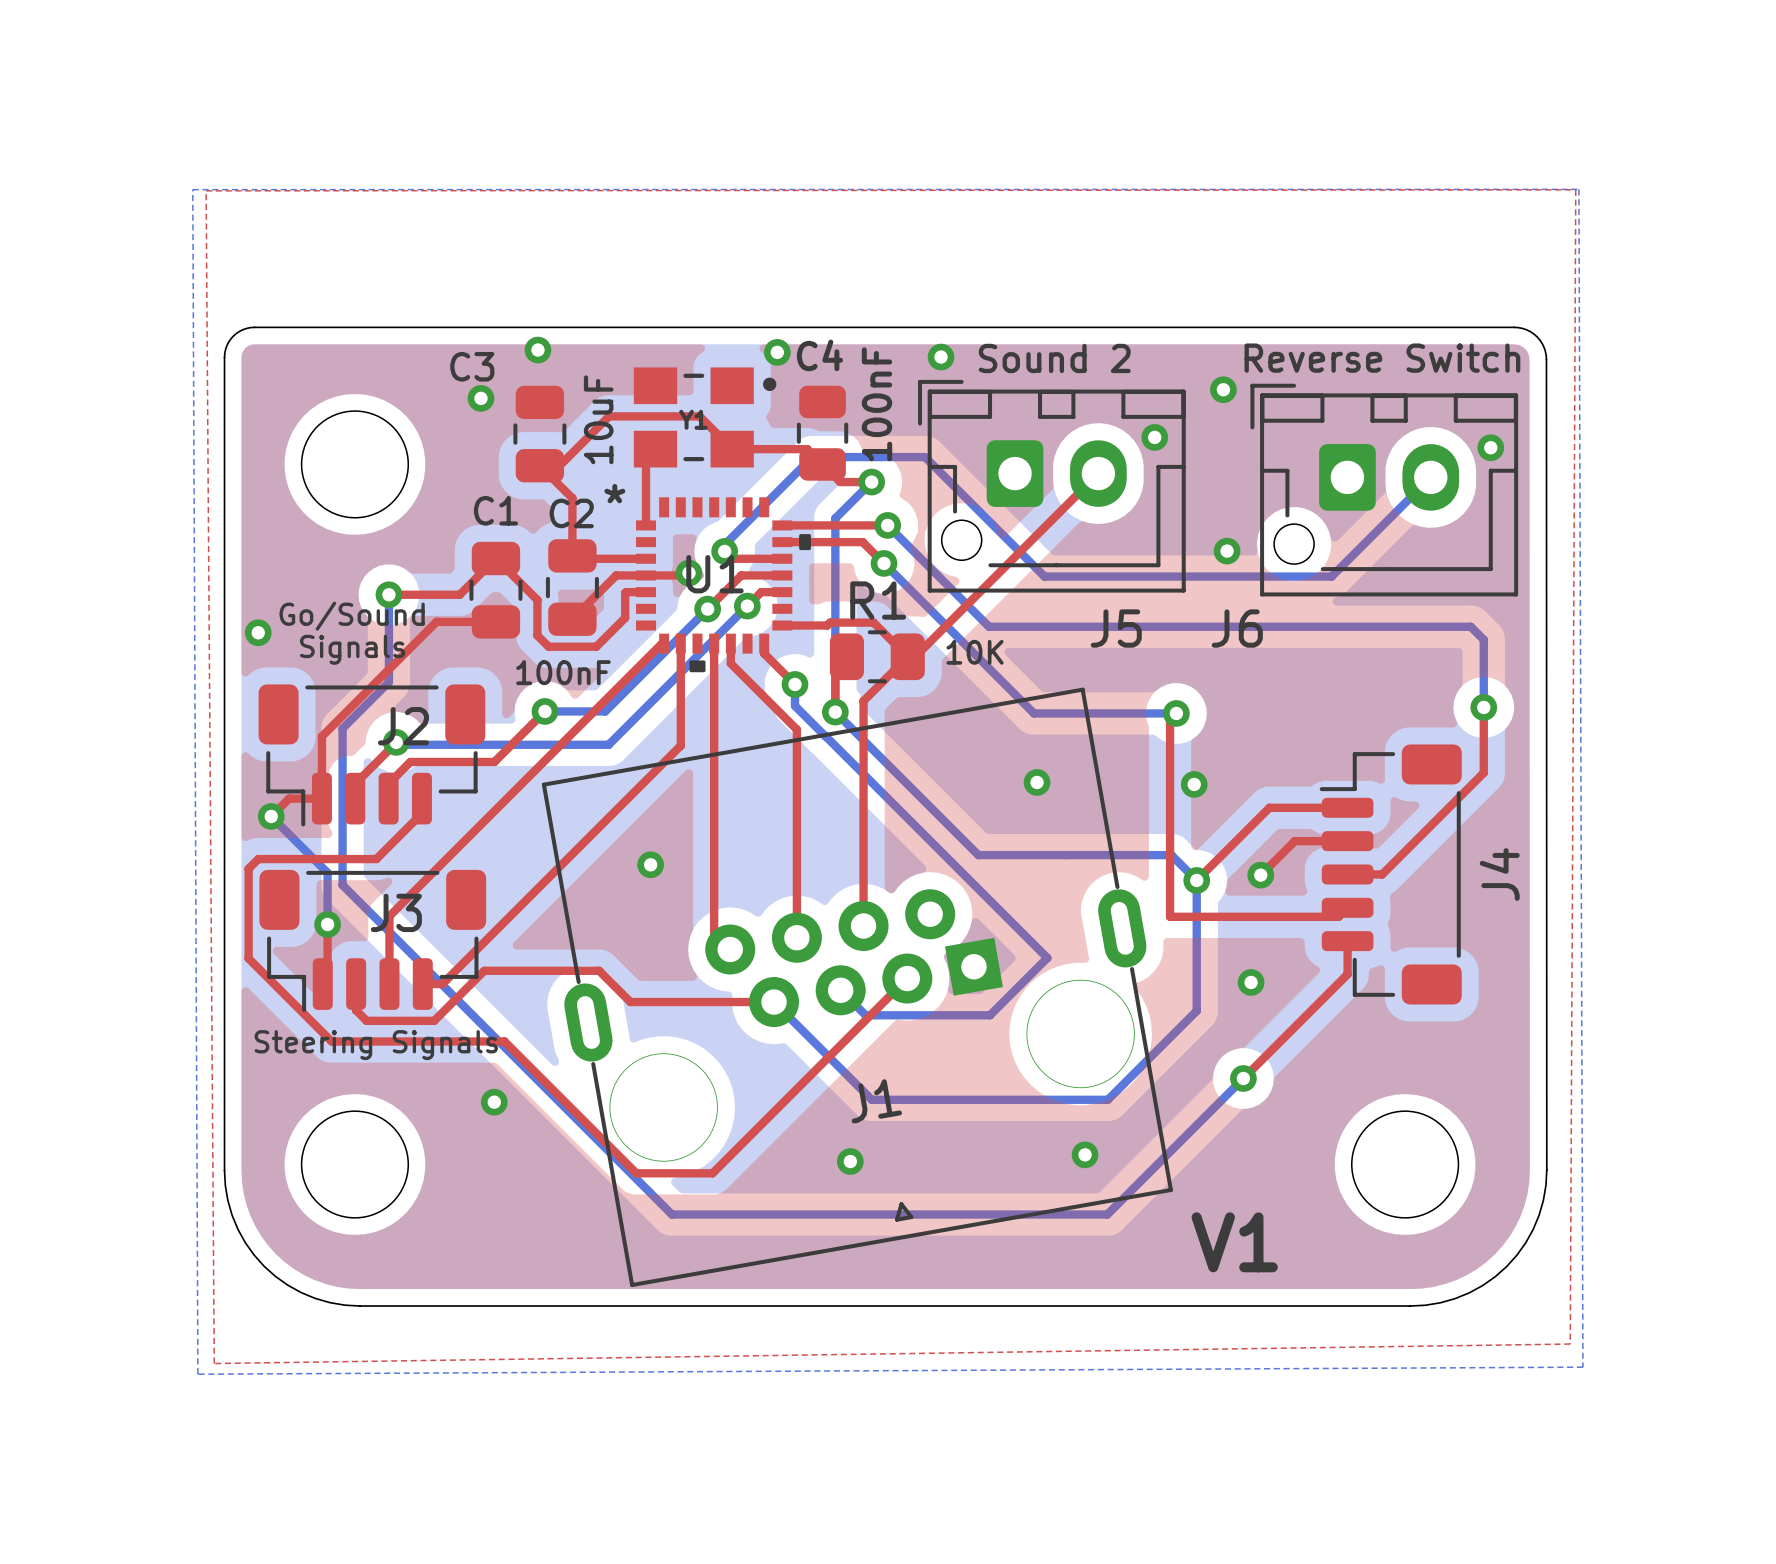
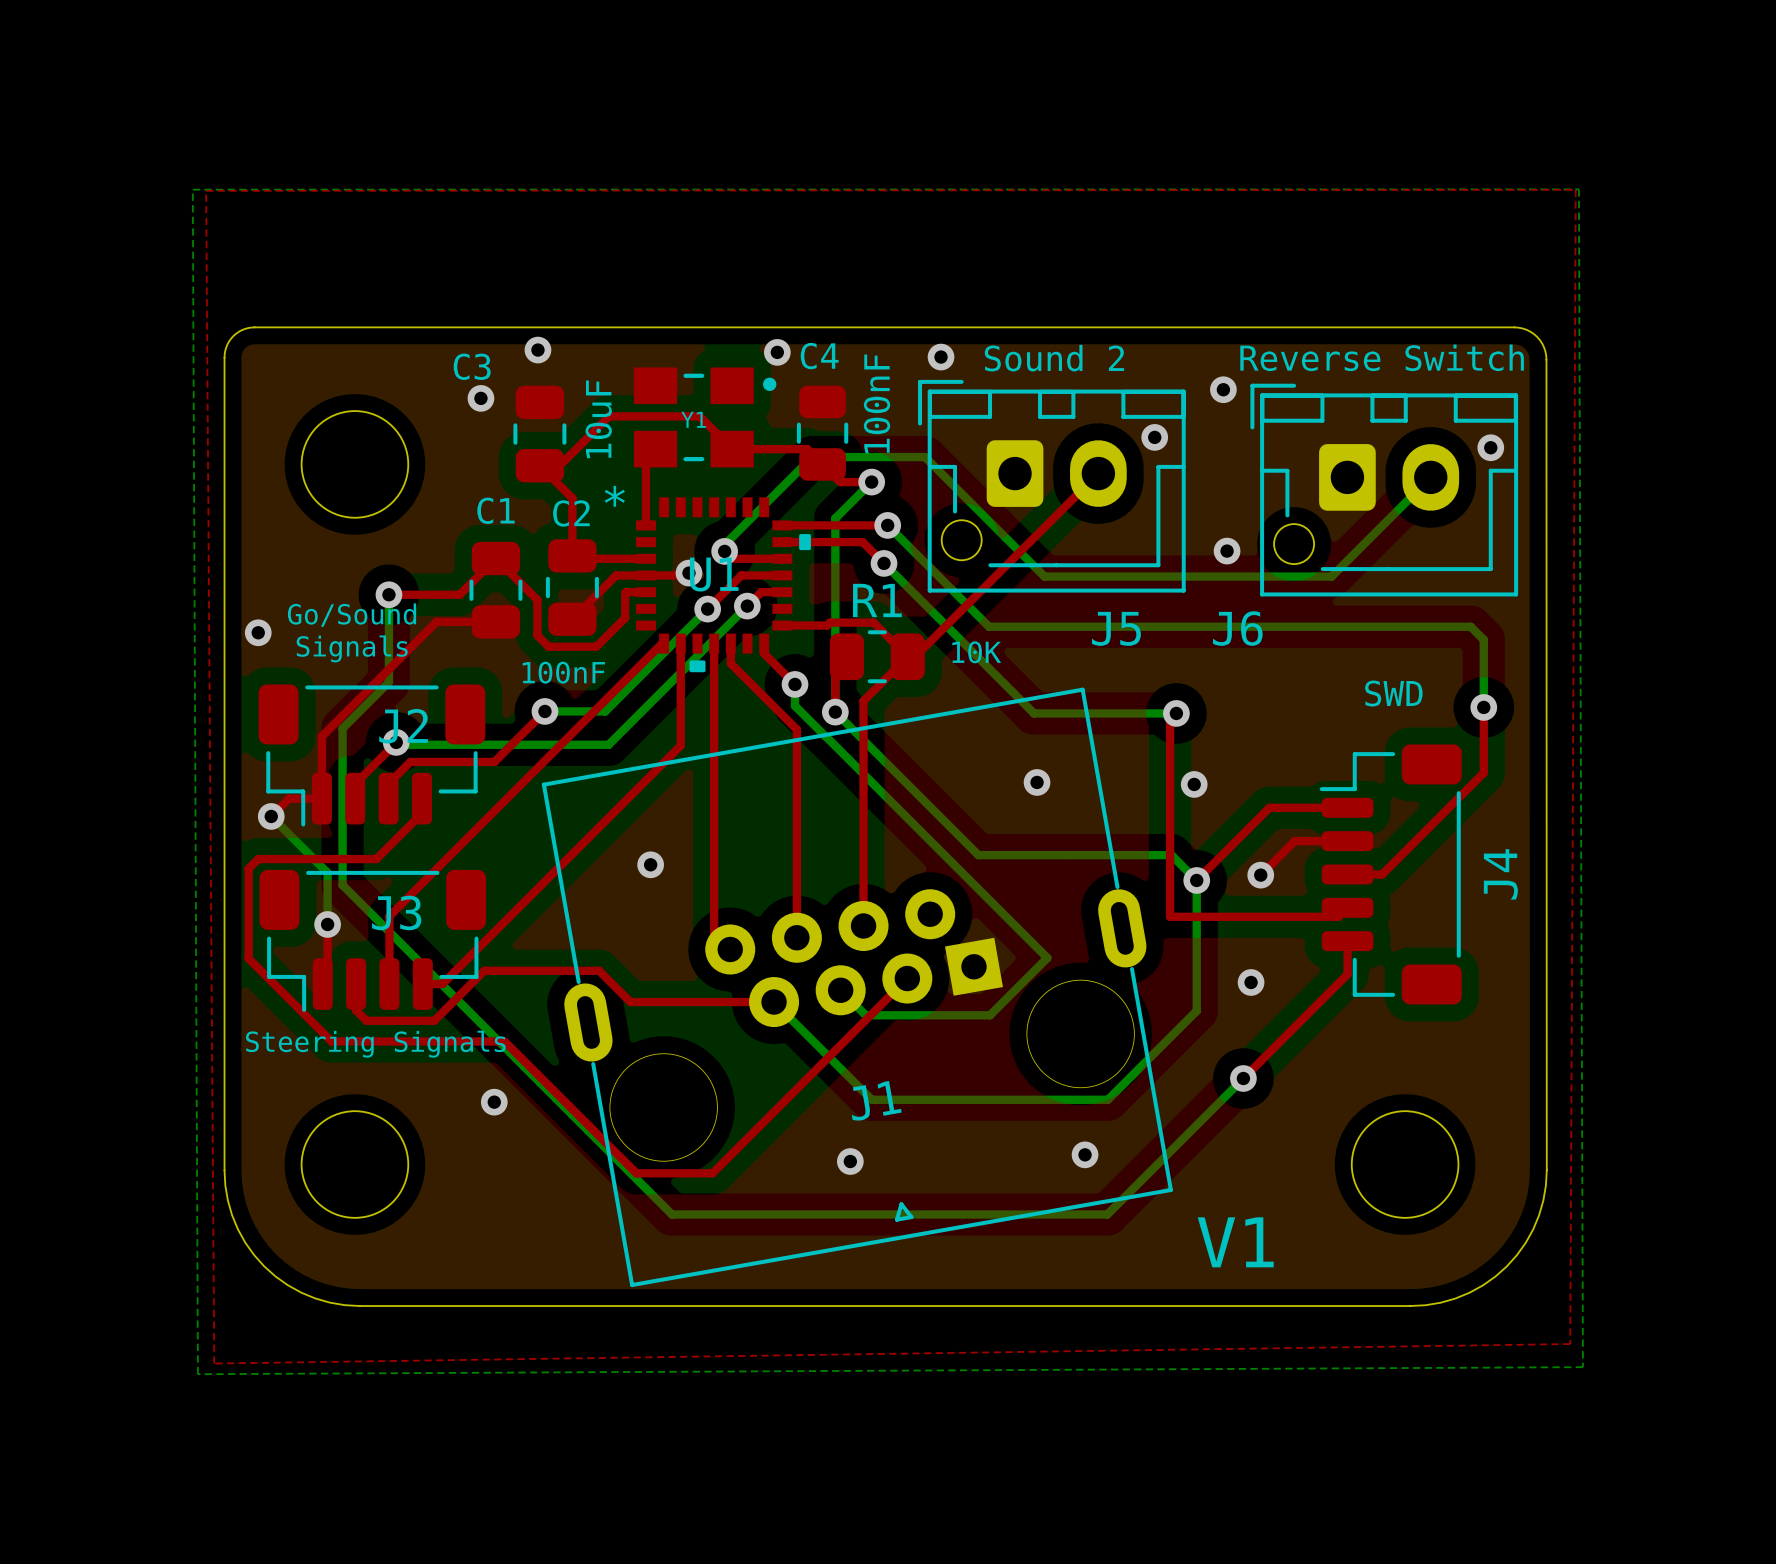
text: none -> SWD (1393, 693)

